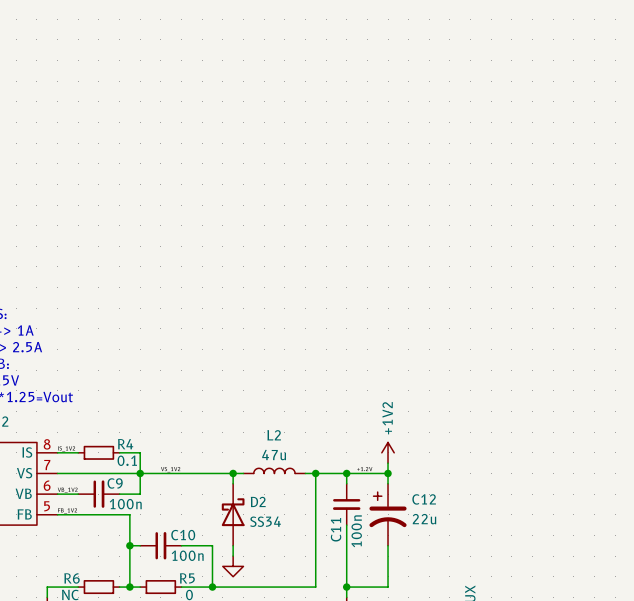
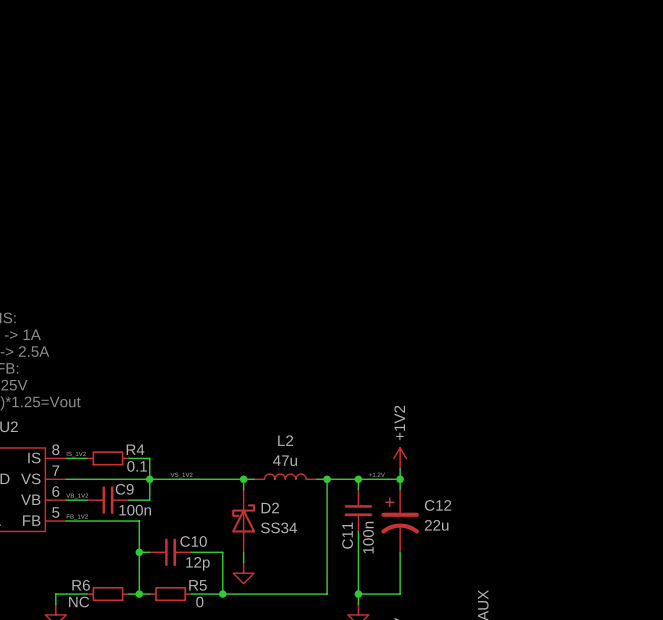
C10 value: 100n (187, 555) -> 12p (197, 563)

